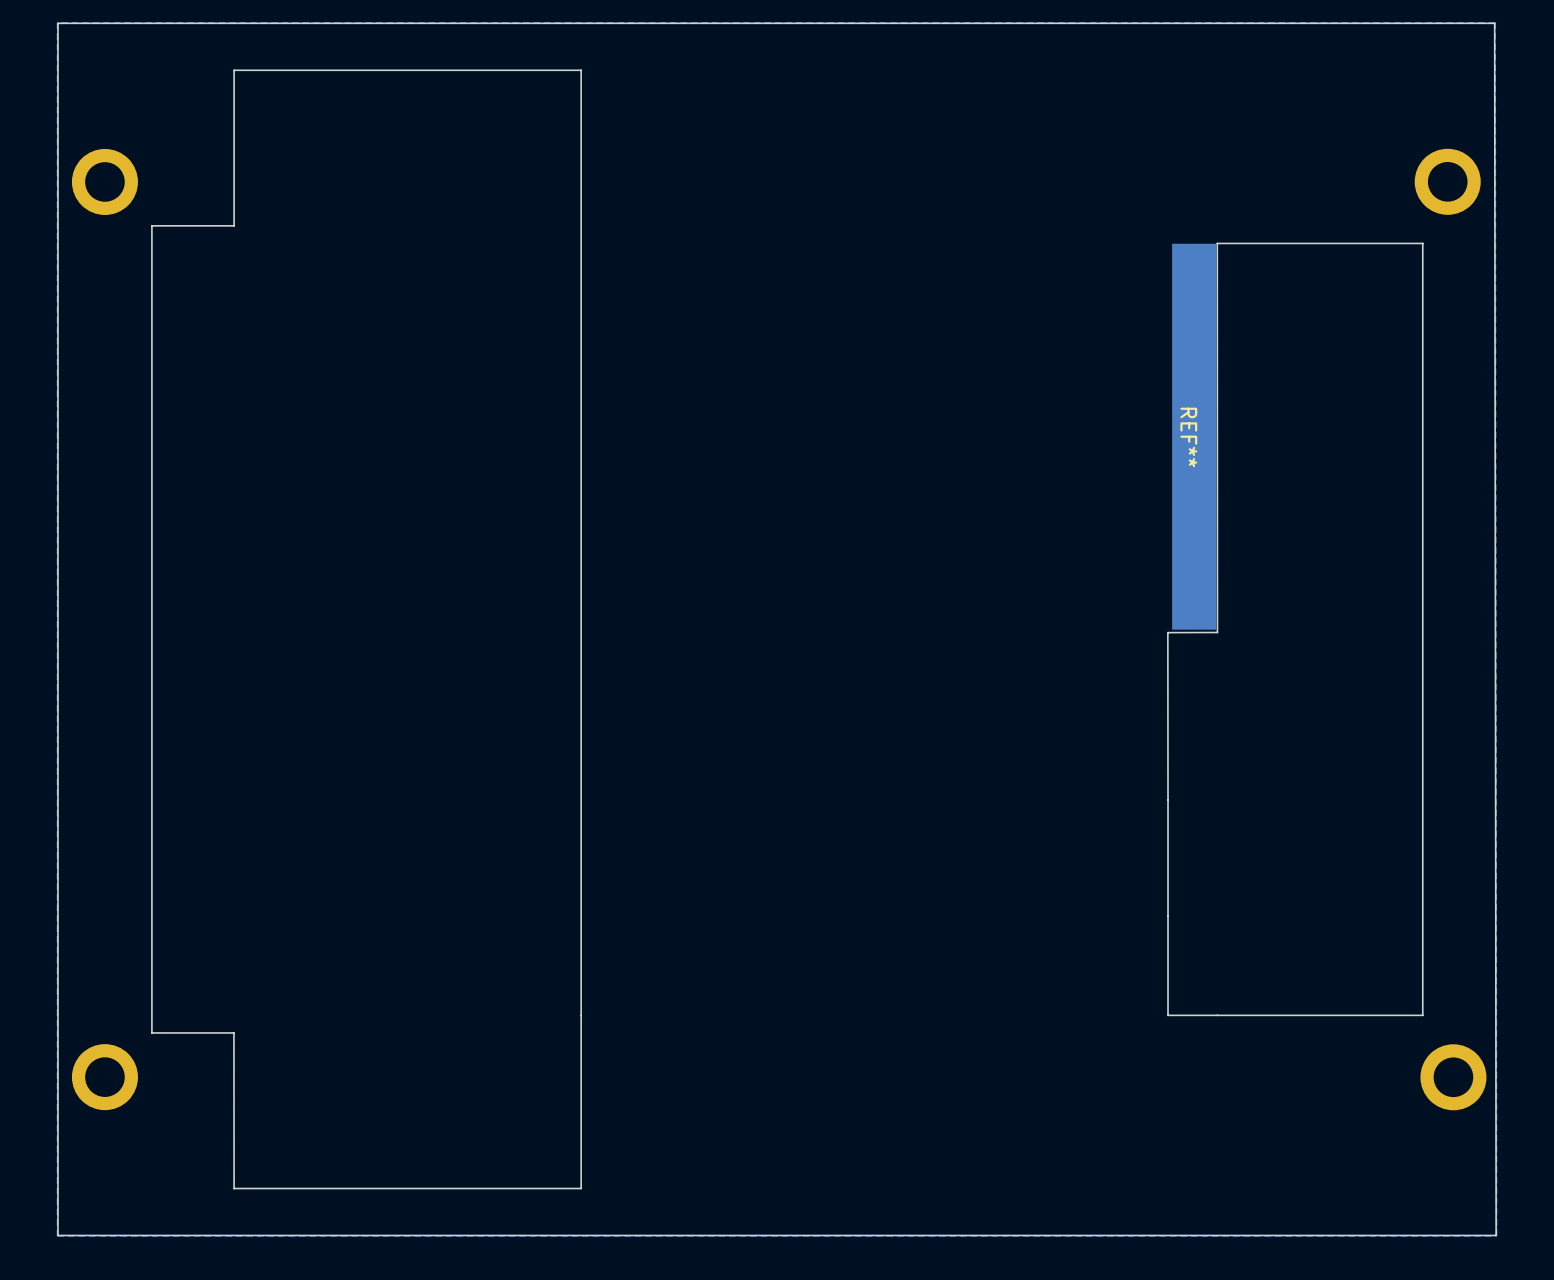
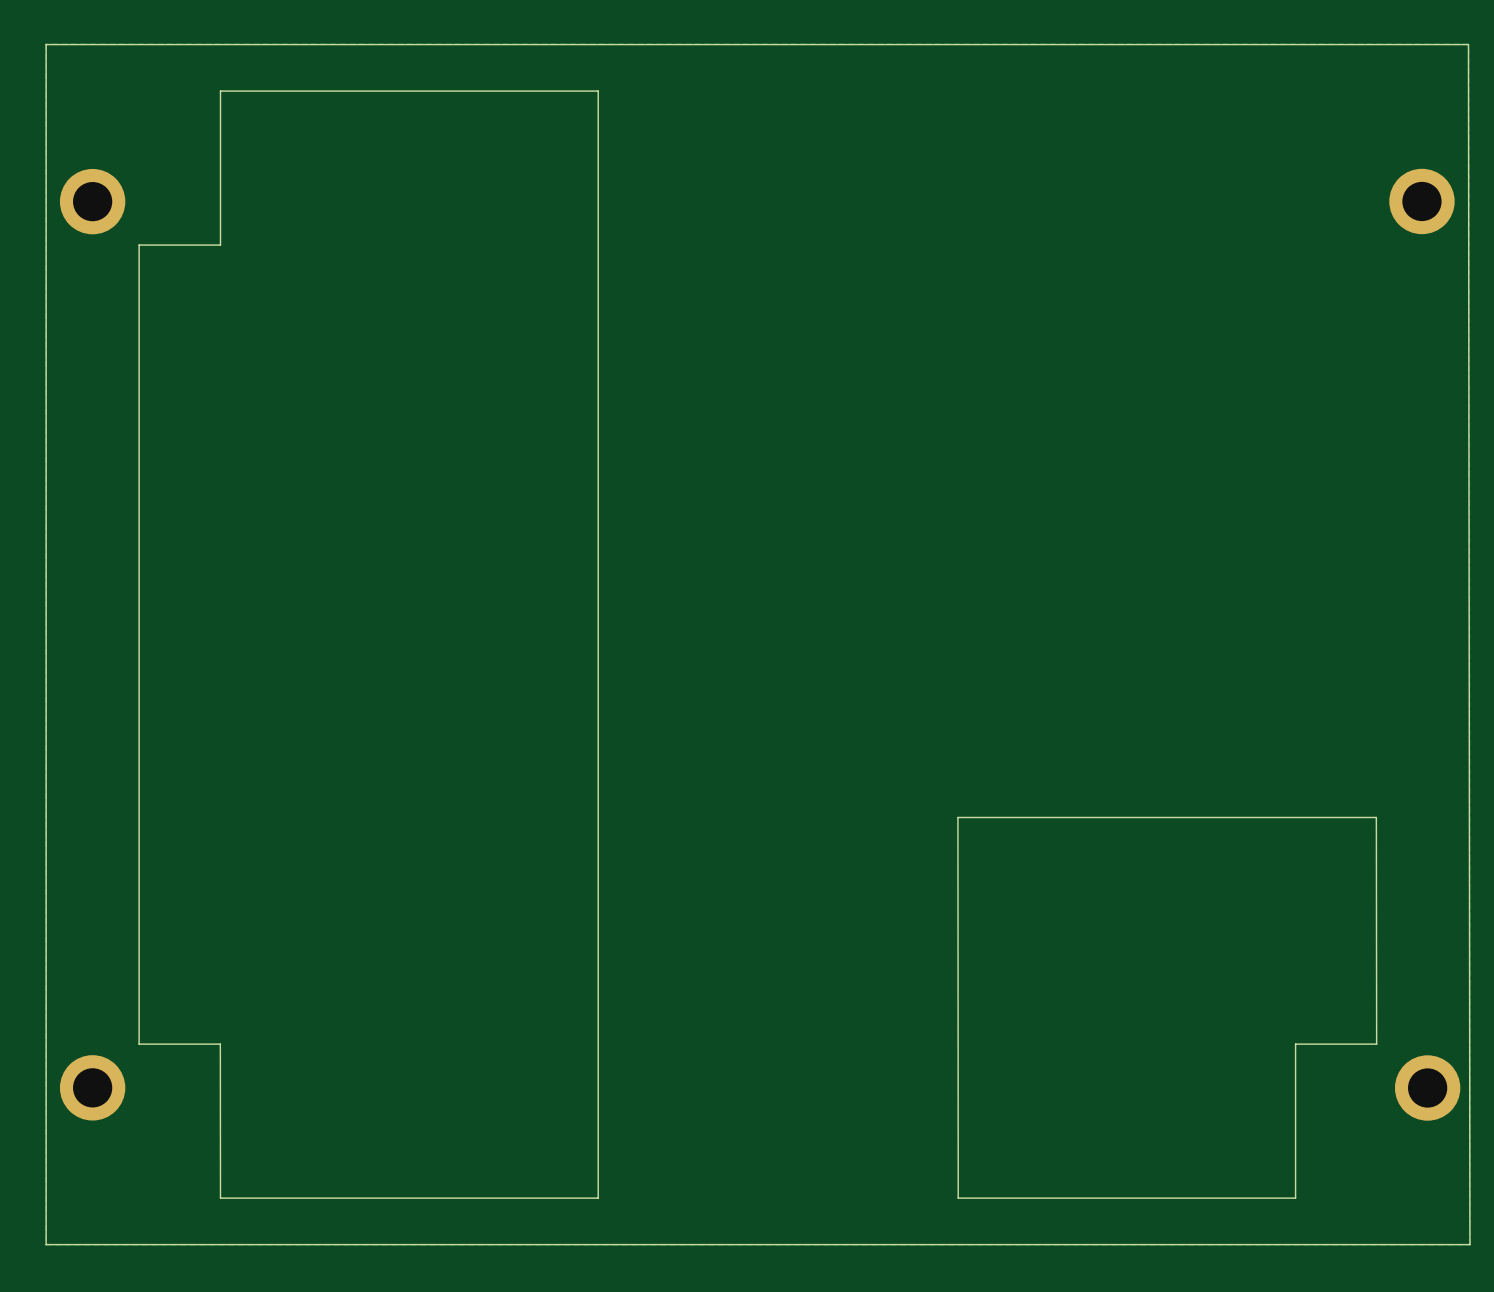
board edge: (581, 70) (581, 1188) -> (564, 91) (598, 91) (598, 1198) (564, 1198)
board edge: (1422, 243) (1422, 1015) (1168, 1015) (1167, 632) (1217, 632) (1217, 243) (1422, 243) -> none
REF**: (1194, 436) -> none
board edge: none -> (1376, 817) (1376, 1044) (1295, 1044) (1295, 1198) (958, 1198) (957, 817) (1376, 817)

